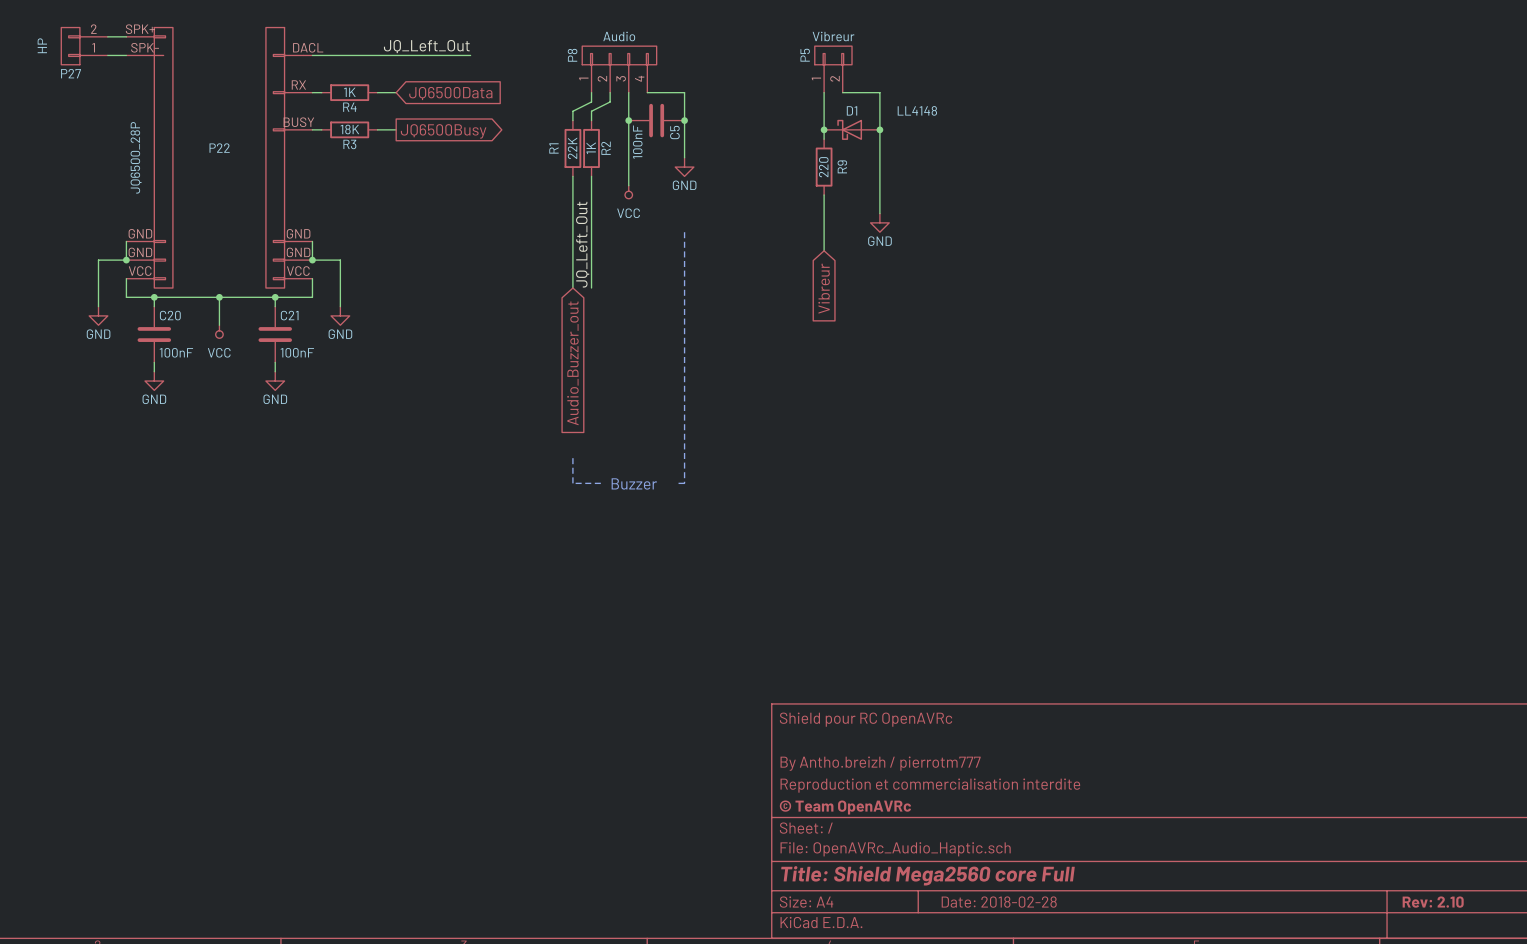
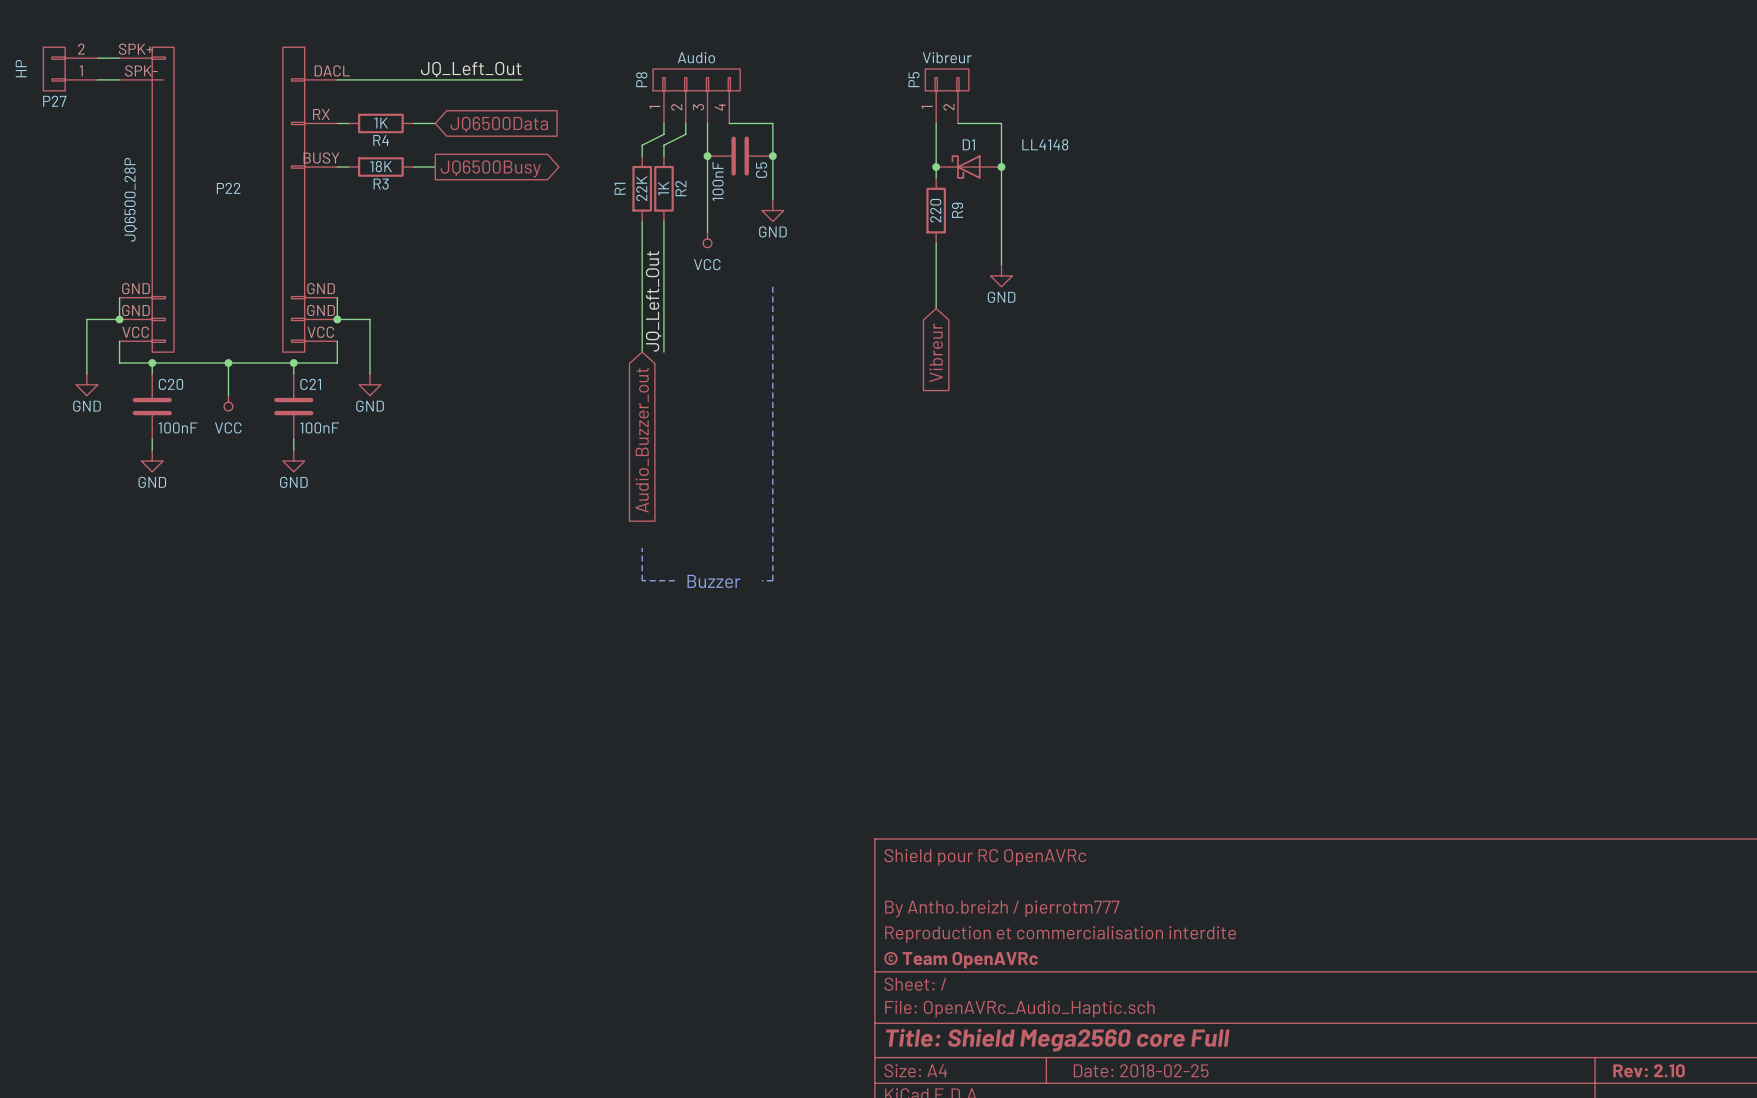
title block: Date: 2018-02-28 (999, 902) -> Date: 2018-02-25 (1141, 1070)

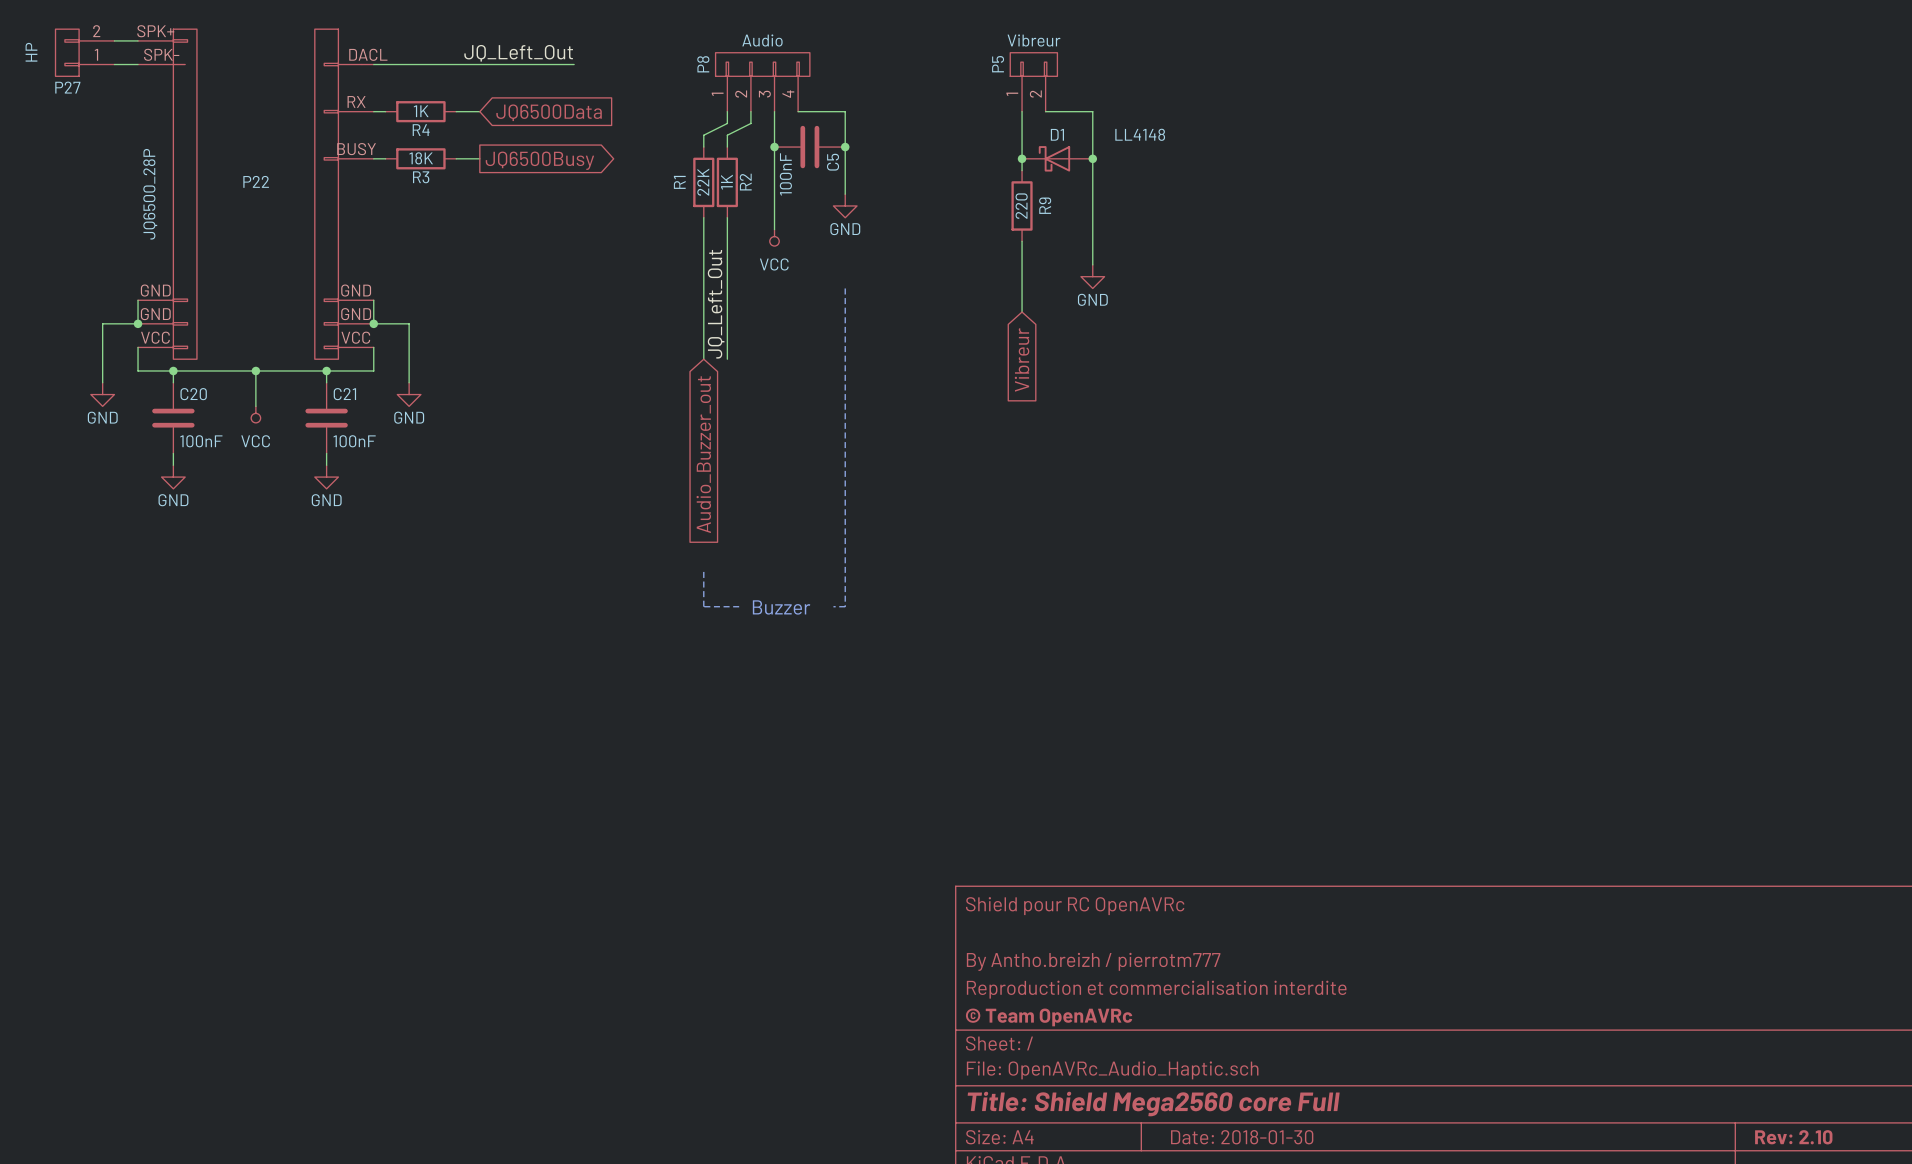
title block: Date: 2018-02-25 (1141, 1070) -> Date: 2018-01-30 (1242, 1137)

